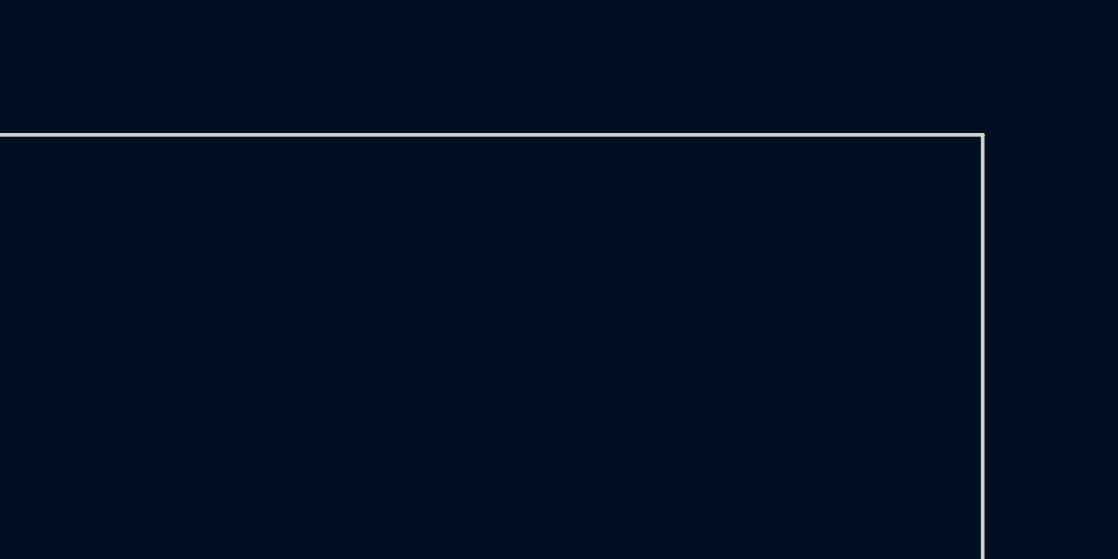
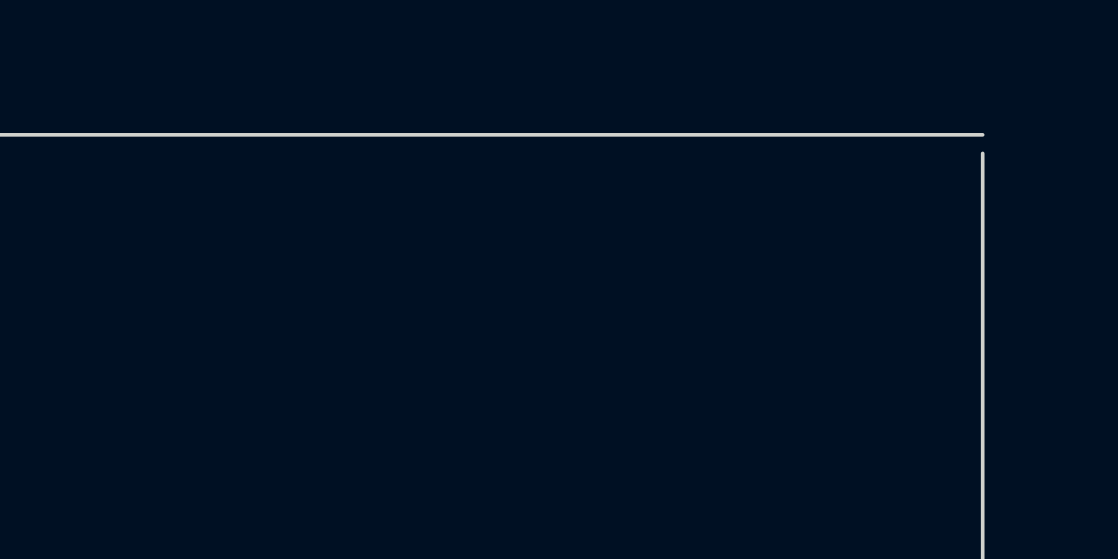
board edge: (982, 134) (982, 153) -> none

